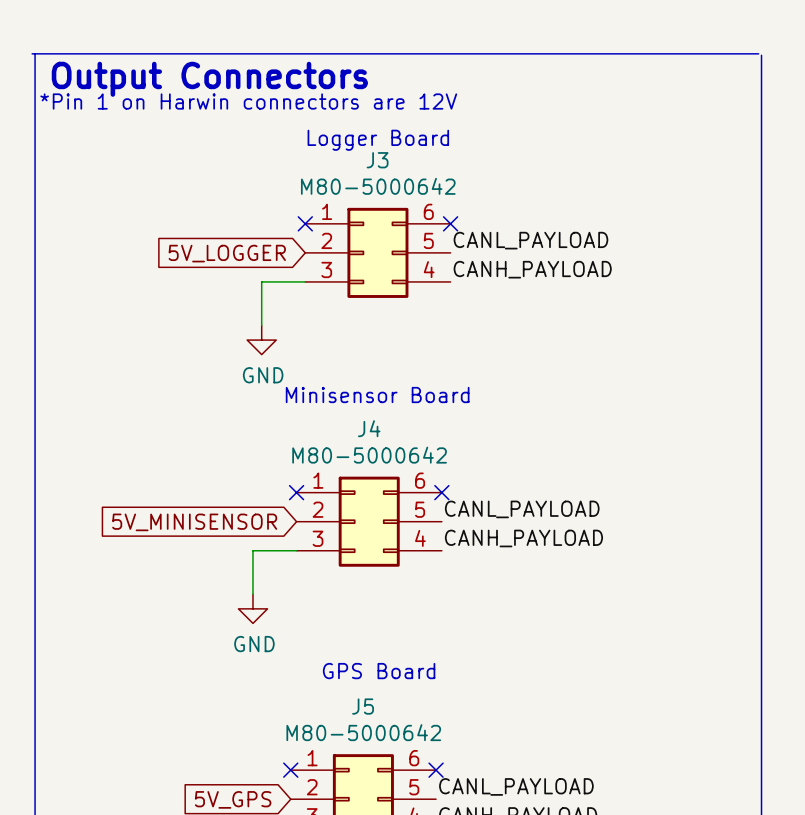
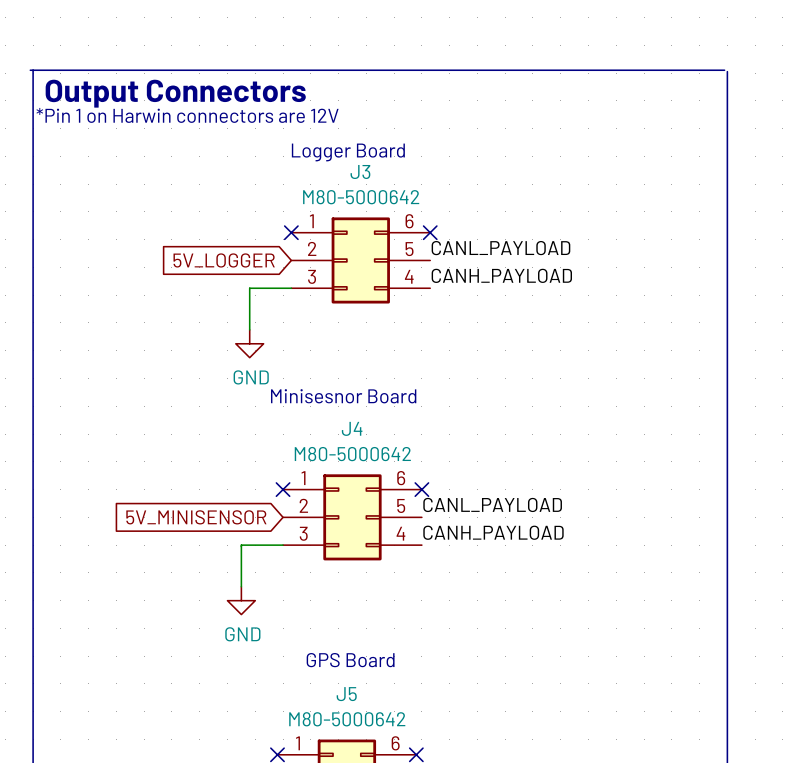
text: Minisensor Board (377, 395) -> Minisesnor Board (343, 396)

